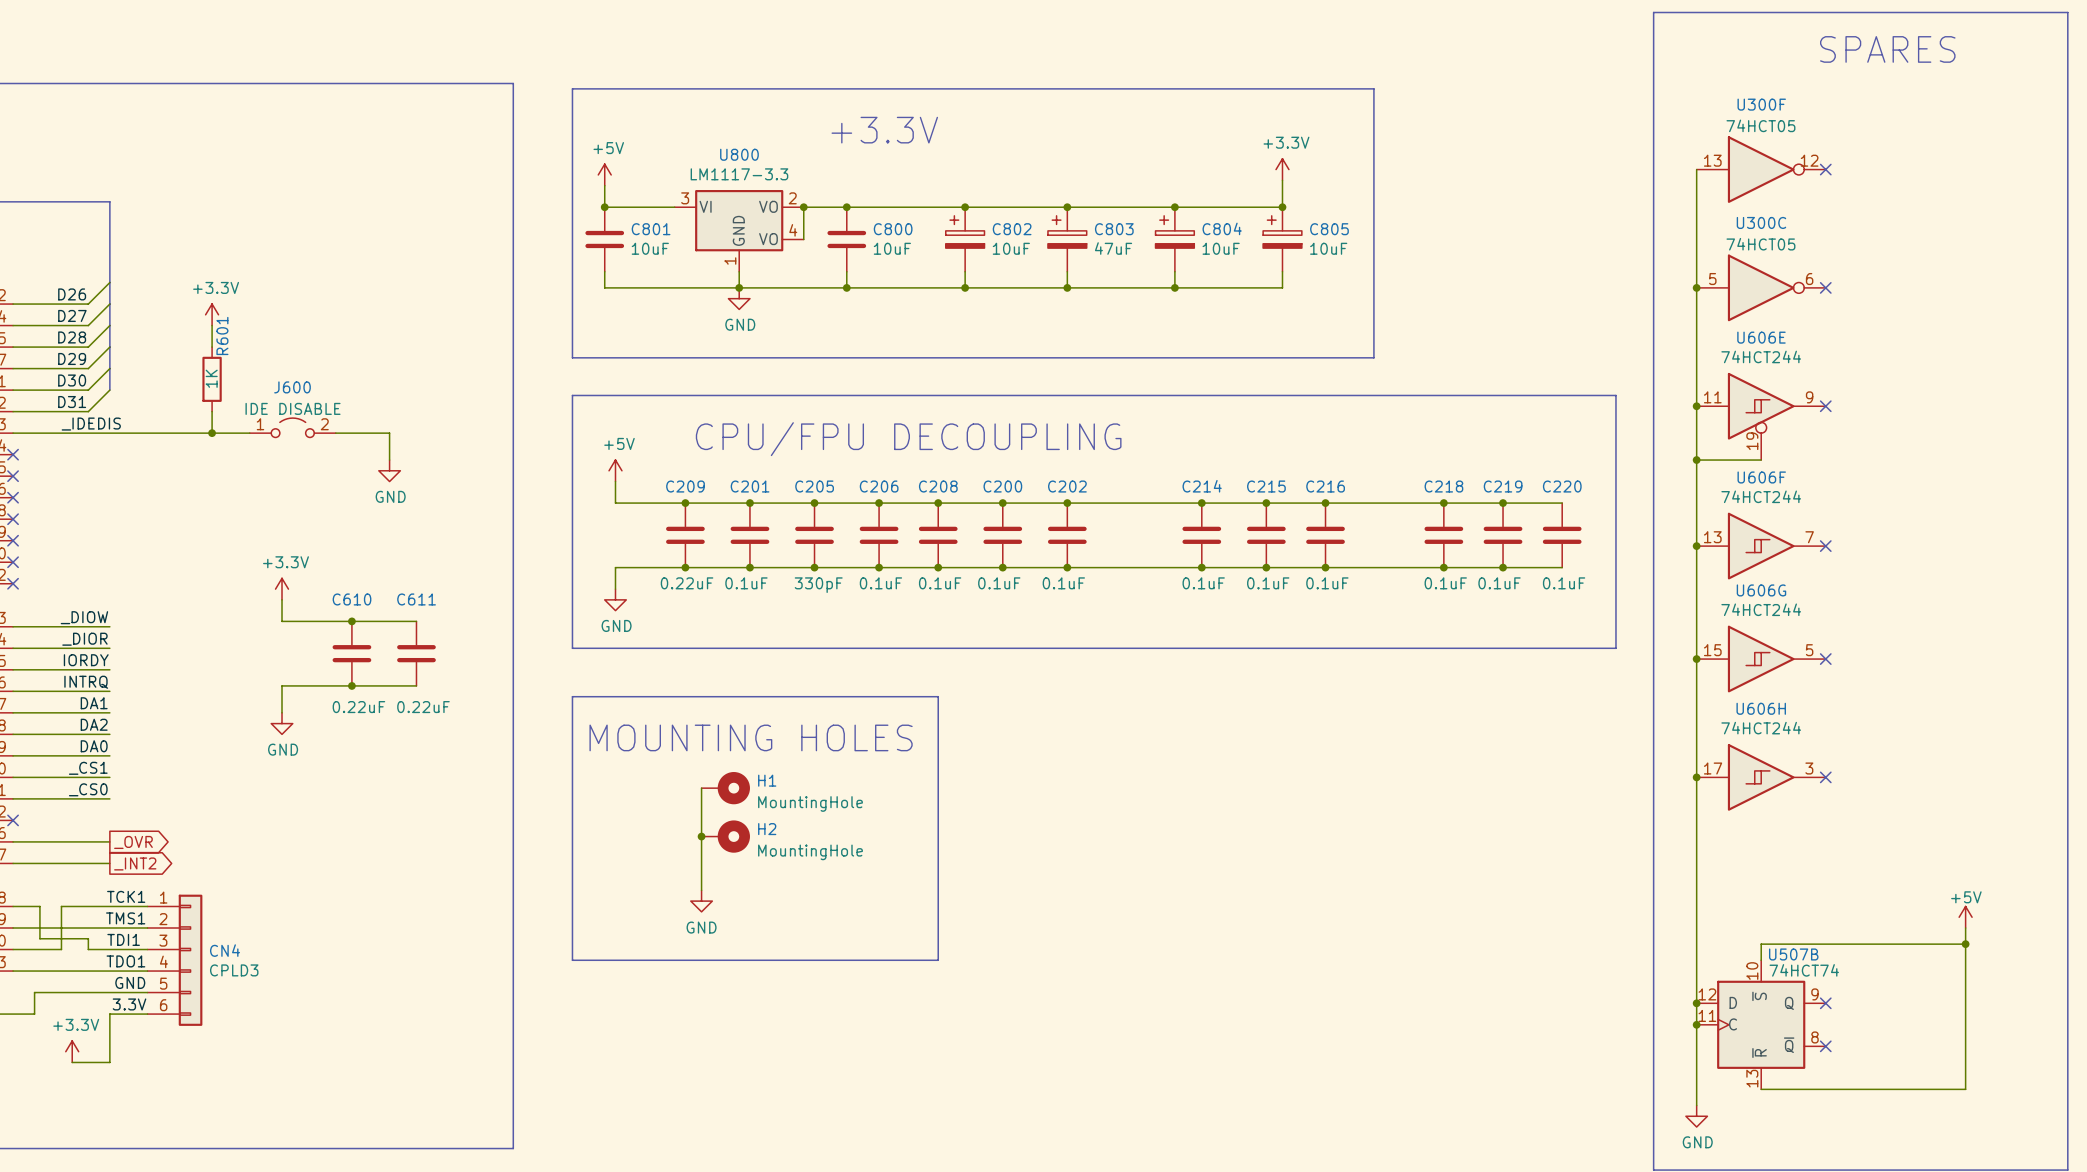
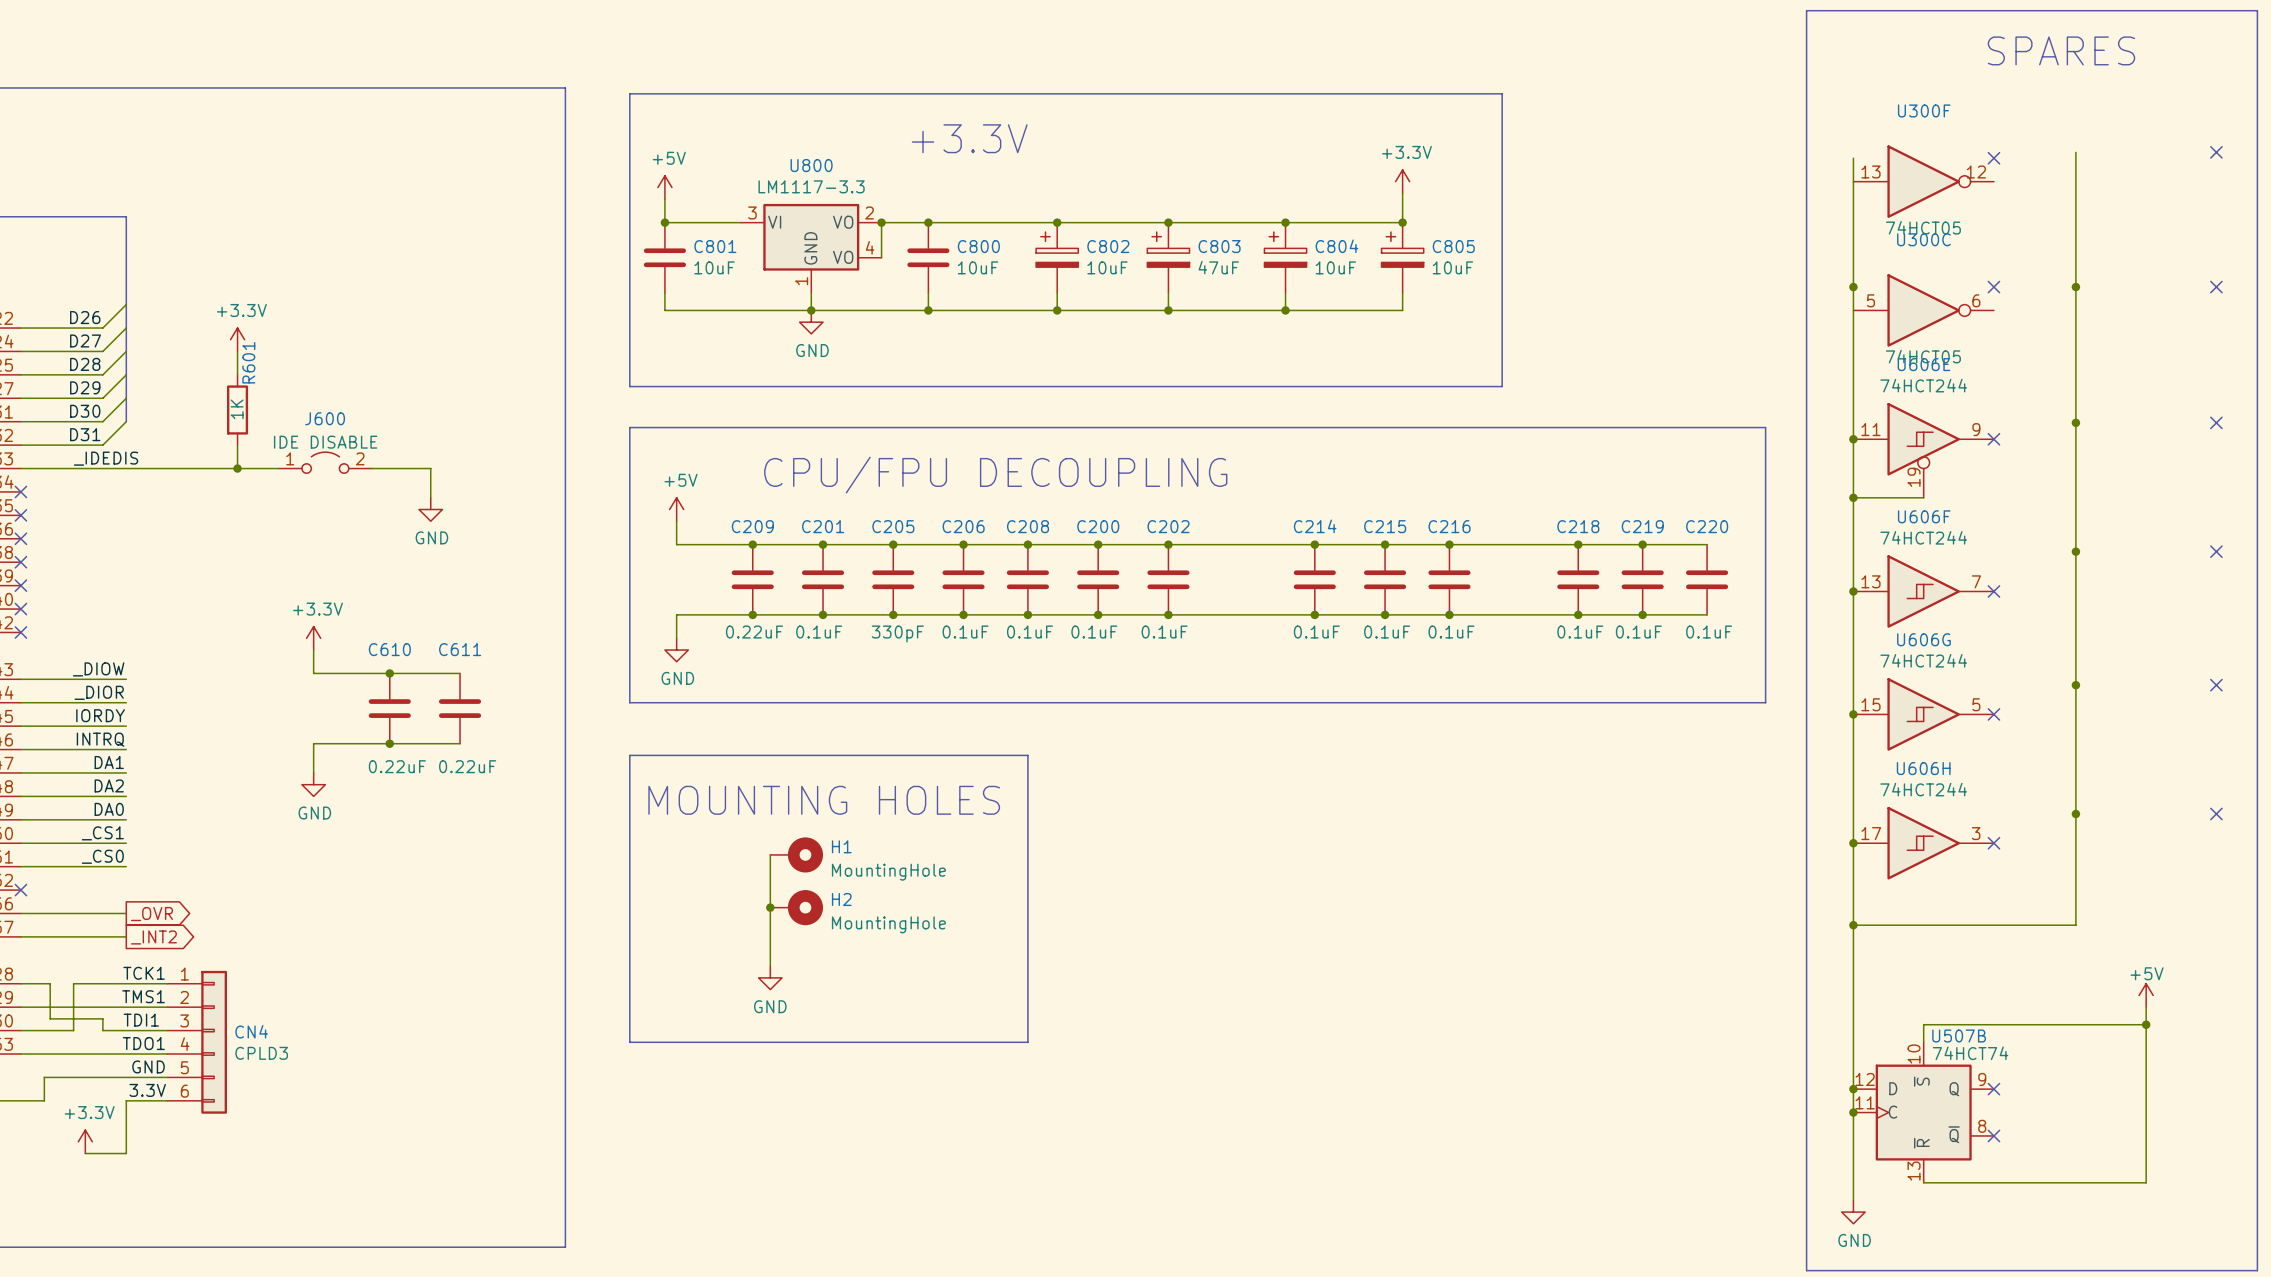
U300F value position: 74HCT05 (1760, 125) -> 74HCT05 (1923, 227)
wire: none -> (2075, 152) (2075, 925) (1853, 925)
no-connect mark: none -> (2216, 152)
wire: none -> (1853, 158) (1853, 181)
no-connect mark position: (1825, 169) -> (1993, 158)
U300C value position: 74HCT05 (1760, 244) -> 74HCT05 (1923, 356)
junction: none -> (2075, 287)
no-connect mark: none -> (2216, 287)
junction position: (1696, 287) -> (1853, 287)
no-connect mark position: (1825, 287) -> (1993, 287)
junction: none -> (2075, 422)
no-connect mark: none -> (2216, 422)
junction: none -> (2075, 551)
no-connect mark: none -> (2216, 551)
junction: none -> (2075, 685)
no-connect mark: none -> (2216, 685)
junction: none -> (2075, 813)
no-connect mark: none -> (2216, 813)
junction: none -> (1853, 925)

